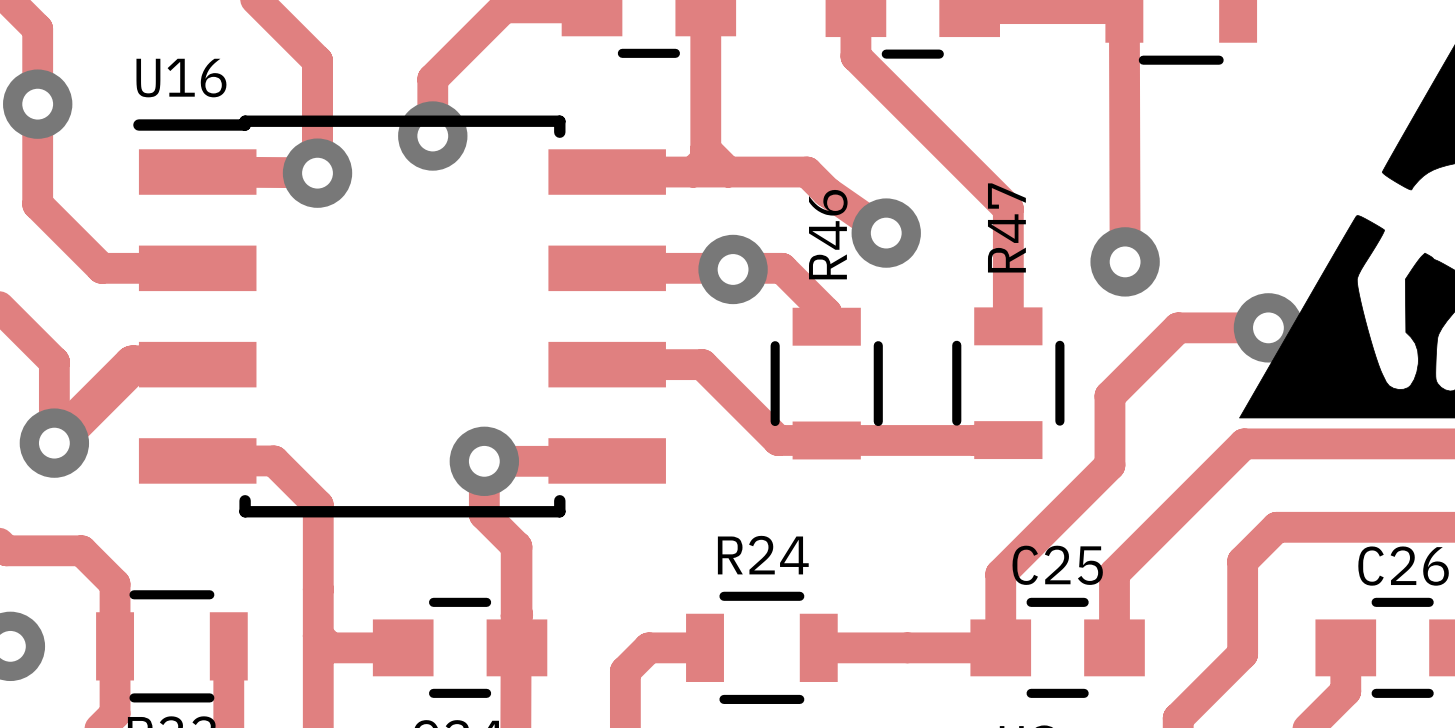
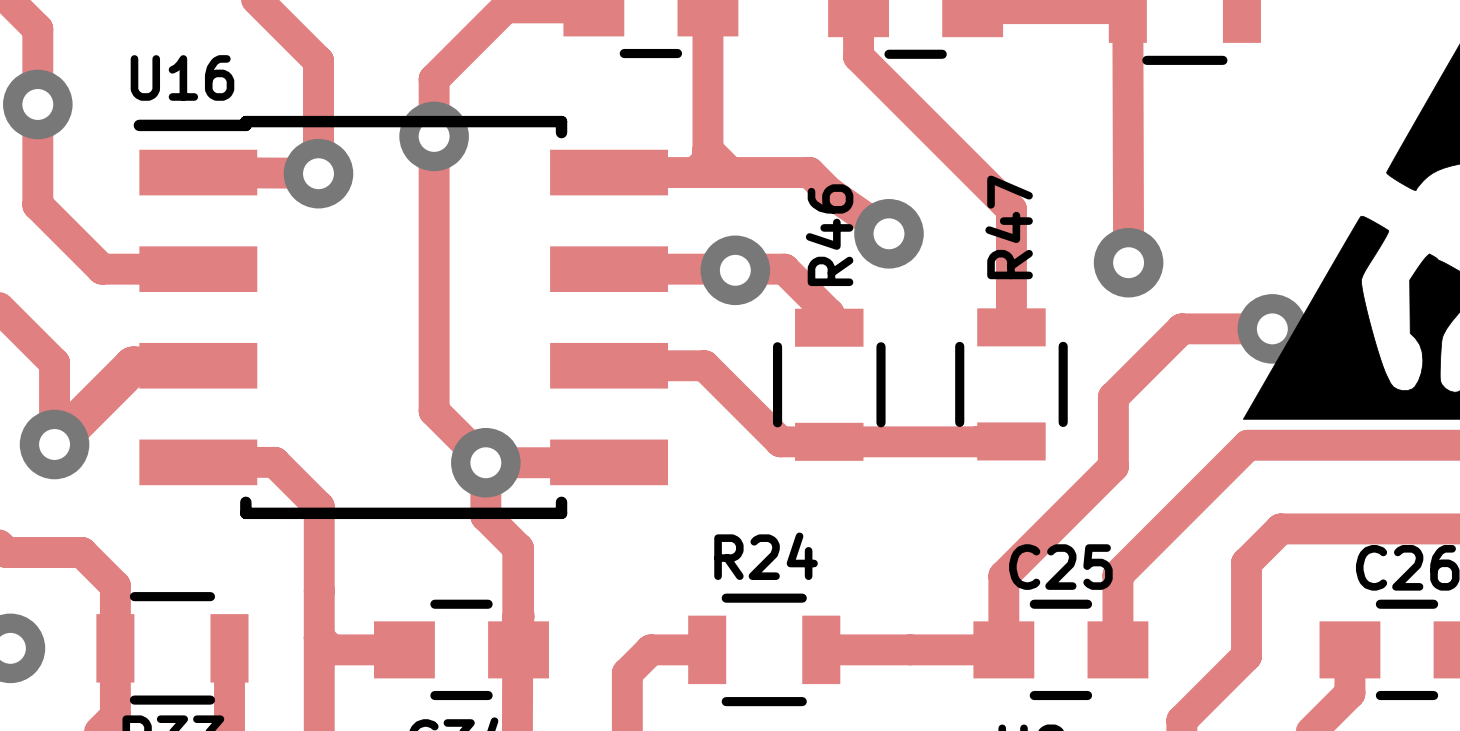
track: none -> (434, 136) (434, 411) (485, 462)

